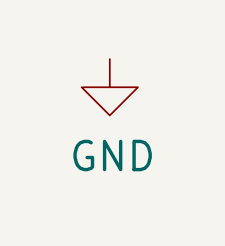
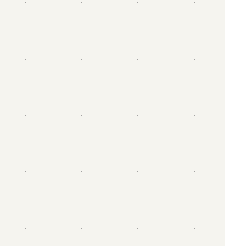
power symbol: GND (109, 87) -> none

